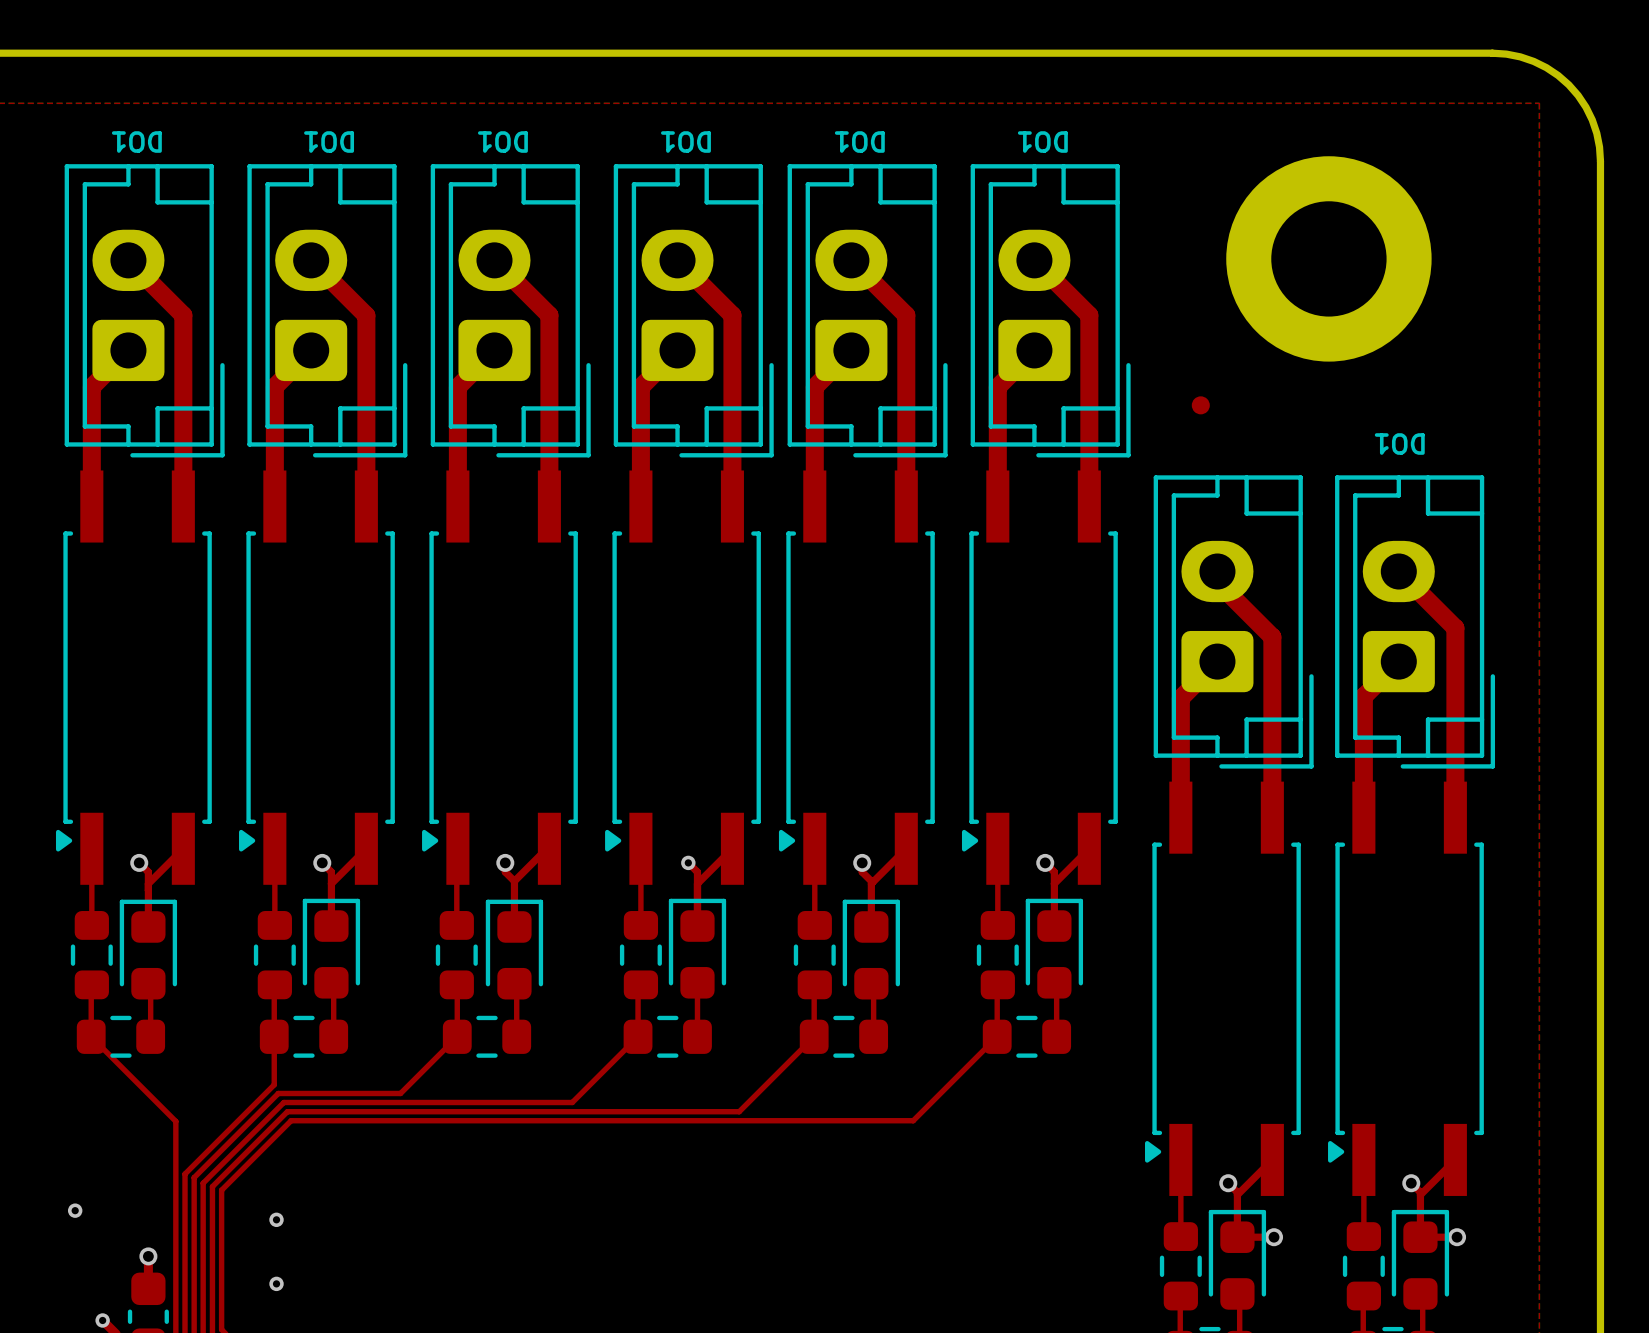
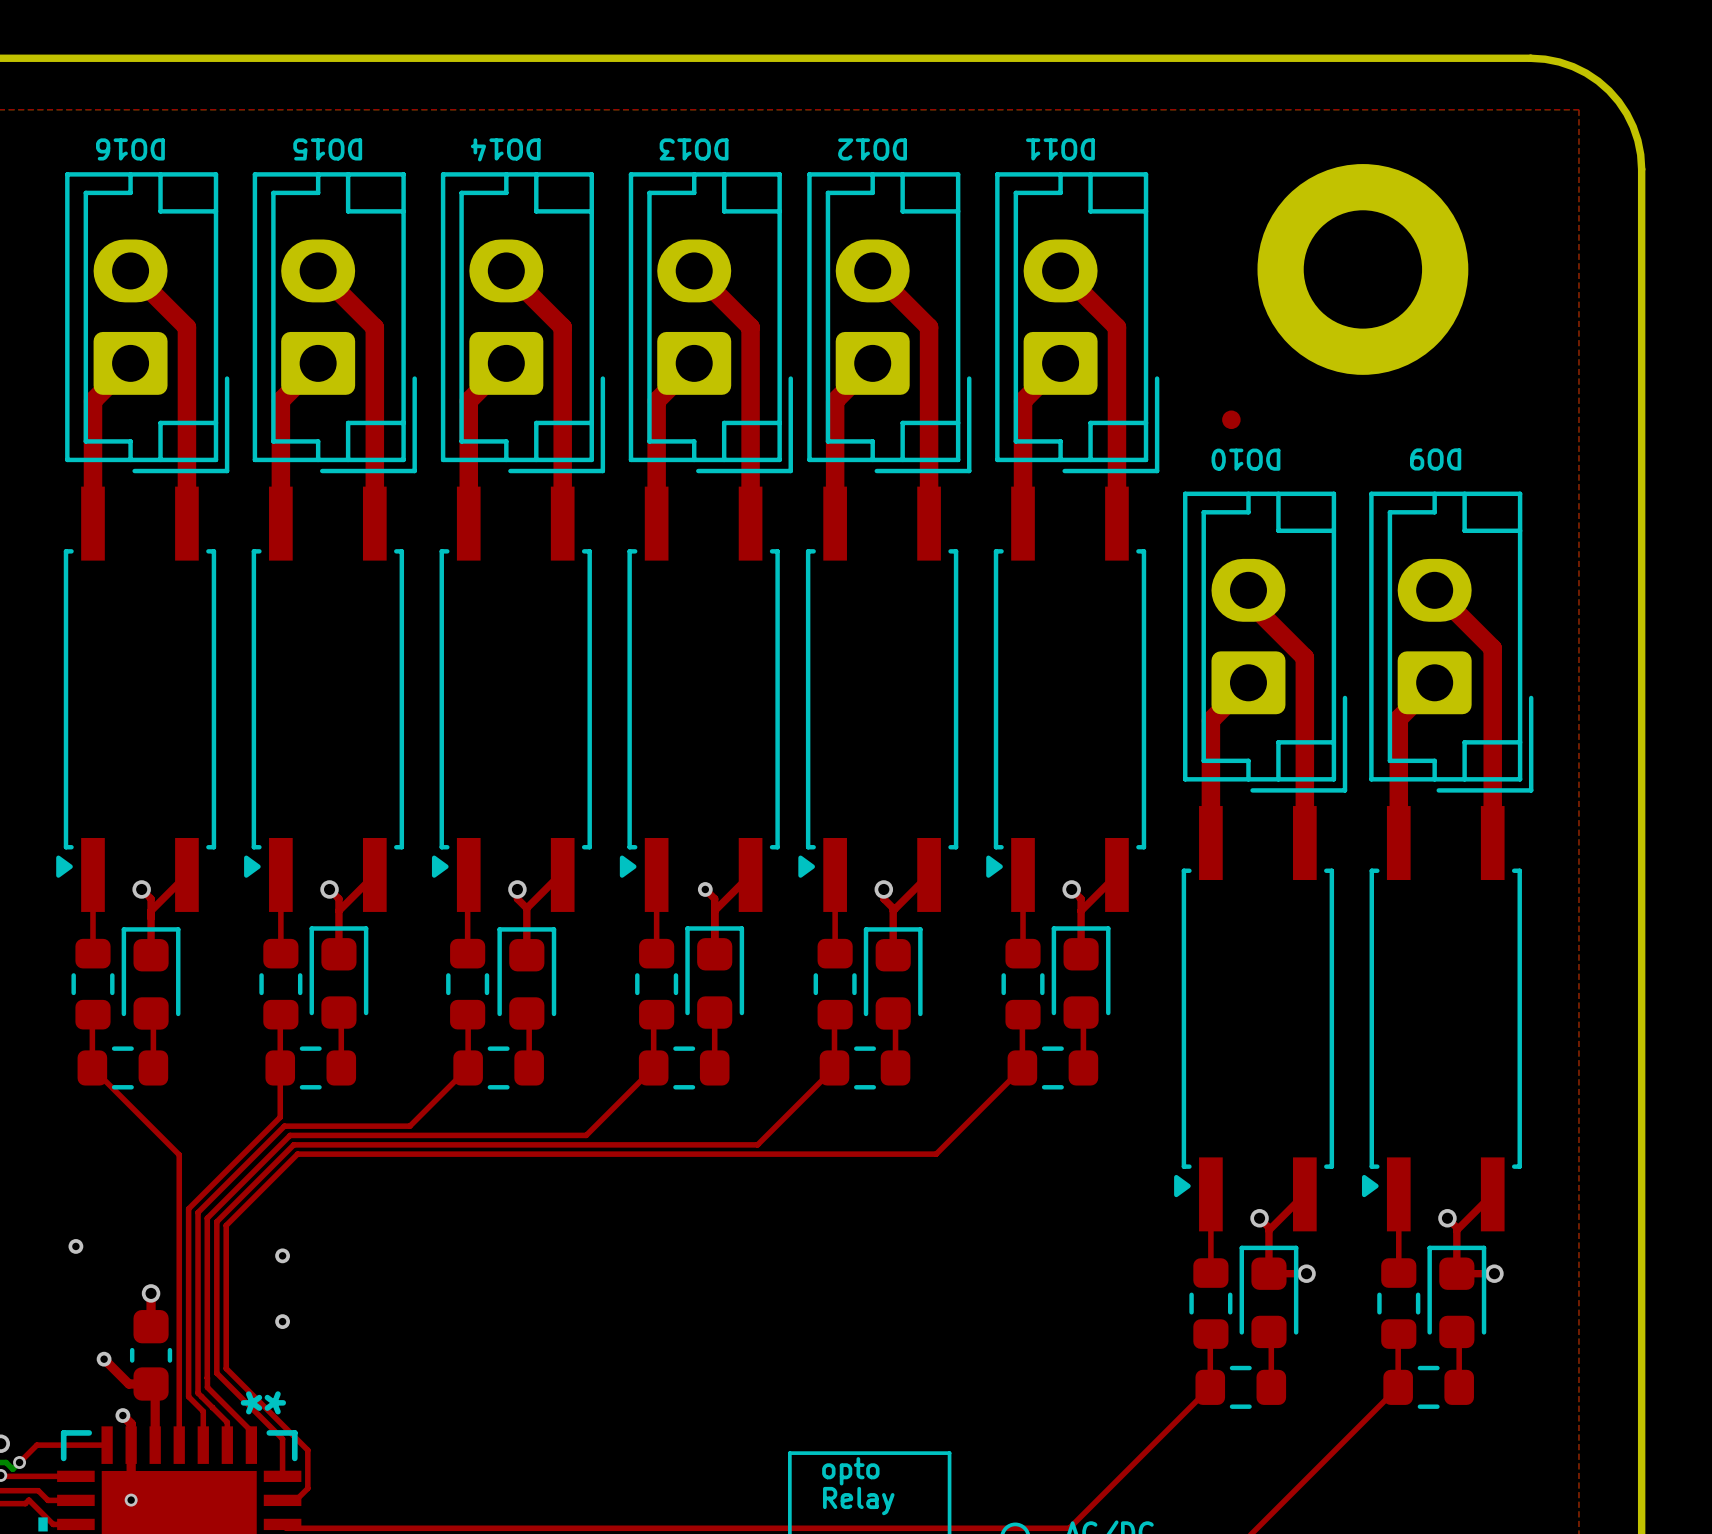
text: DO1 (136, 142) -> DO16 (130, 149)
text: DO1 (329, 142) -> DO15 (327, 149)
text: DO1 (502, 142) -> DO14 (505, 149)
text: DO1 (685, 142) -> DO13 (694, 149)
text: DO1 (859, 142) -> DO12 (872, 149)
text: DO1 (1042, 142) -> DO11 (1060, 149)
text: none -> DO10 (1245, 459)
text: DO1 (1399, 444) -> DO9 (1435, 459)

